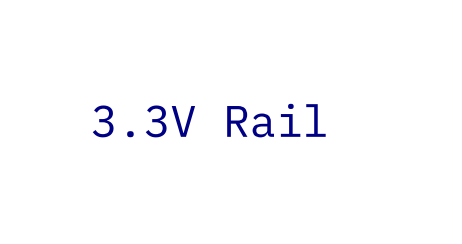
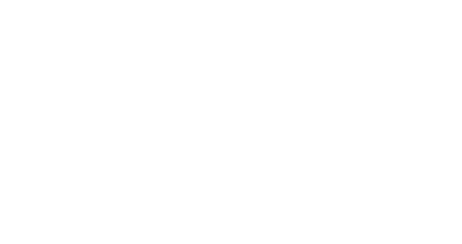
text: 3.3V Rail (209, 120) -> none

